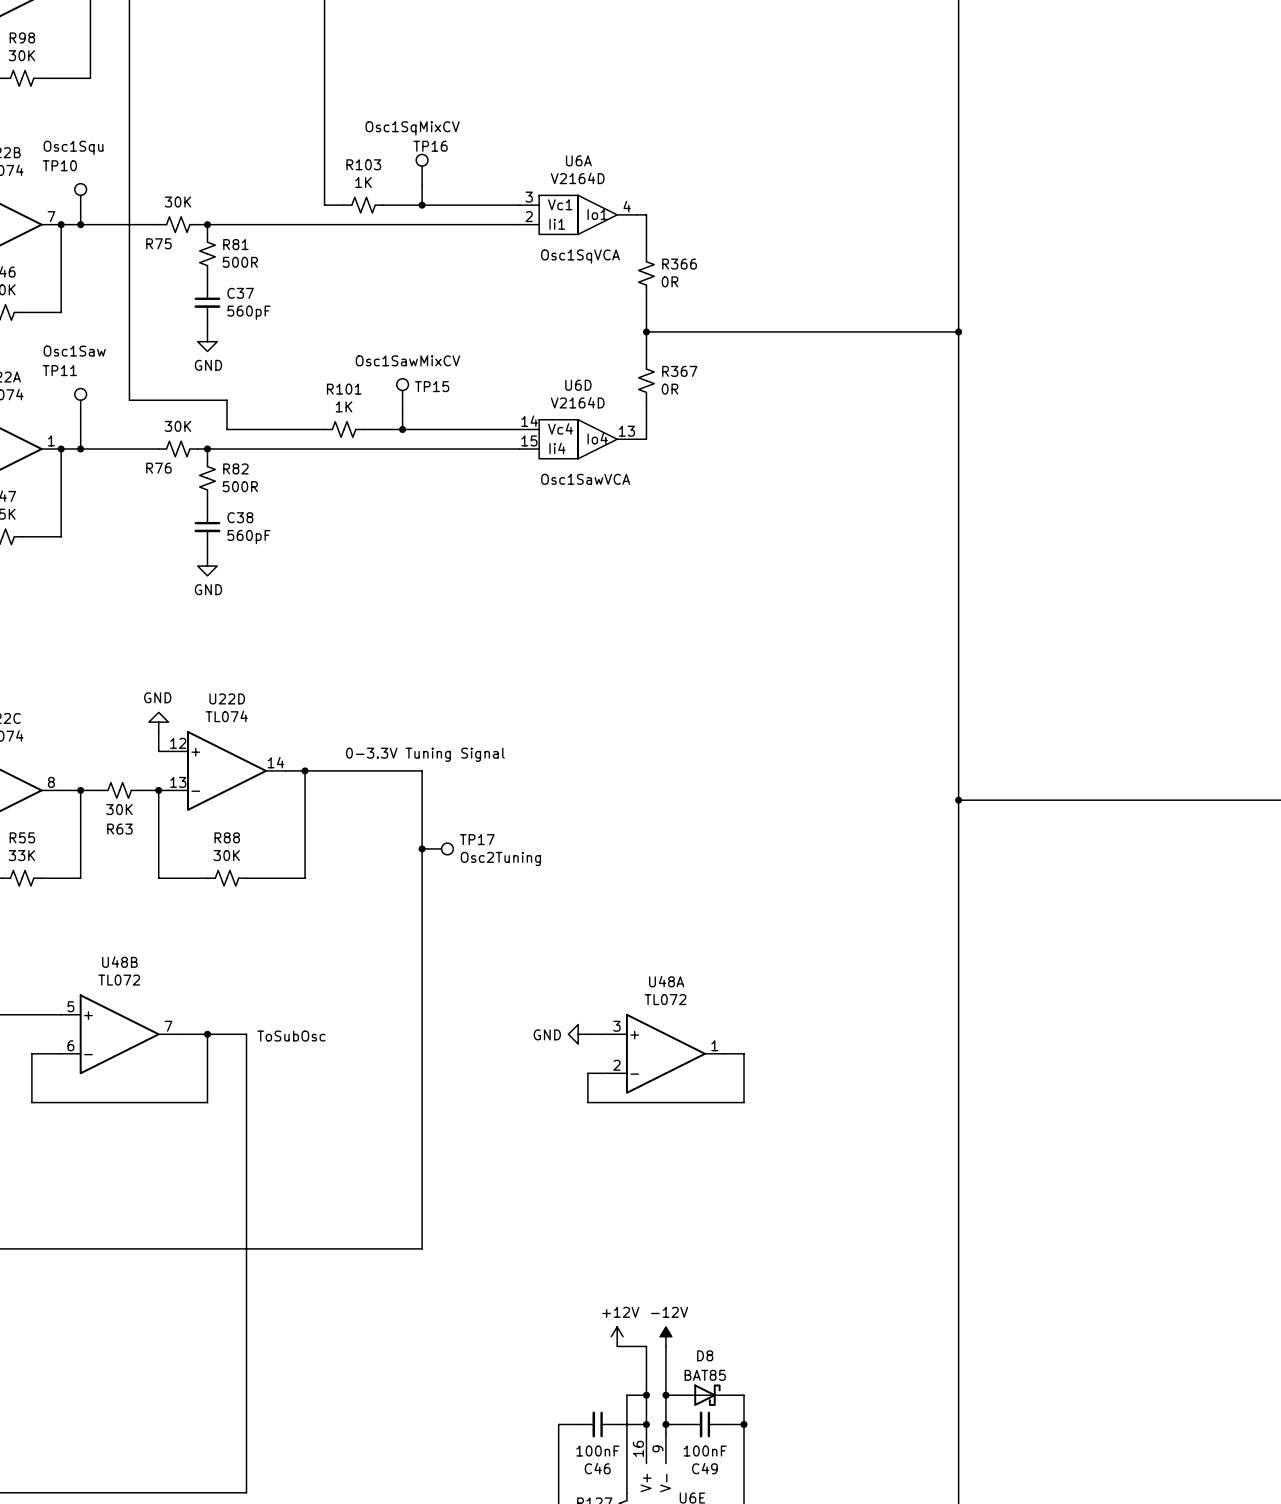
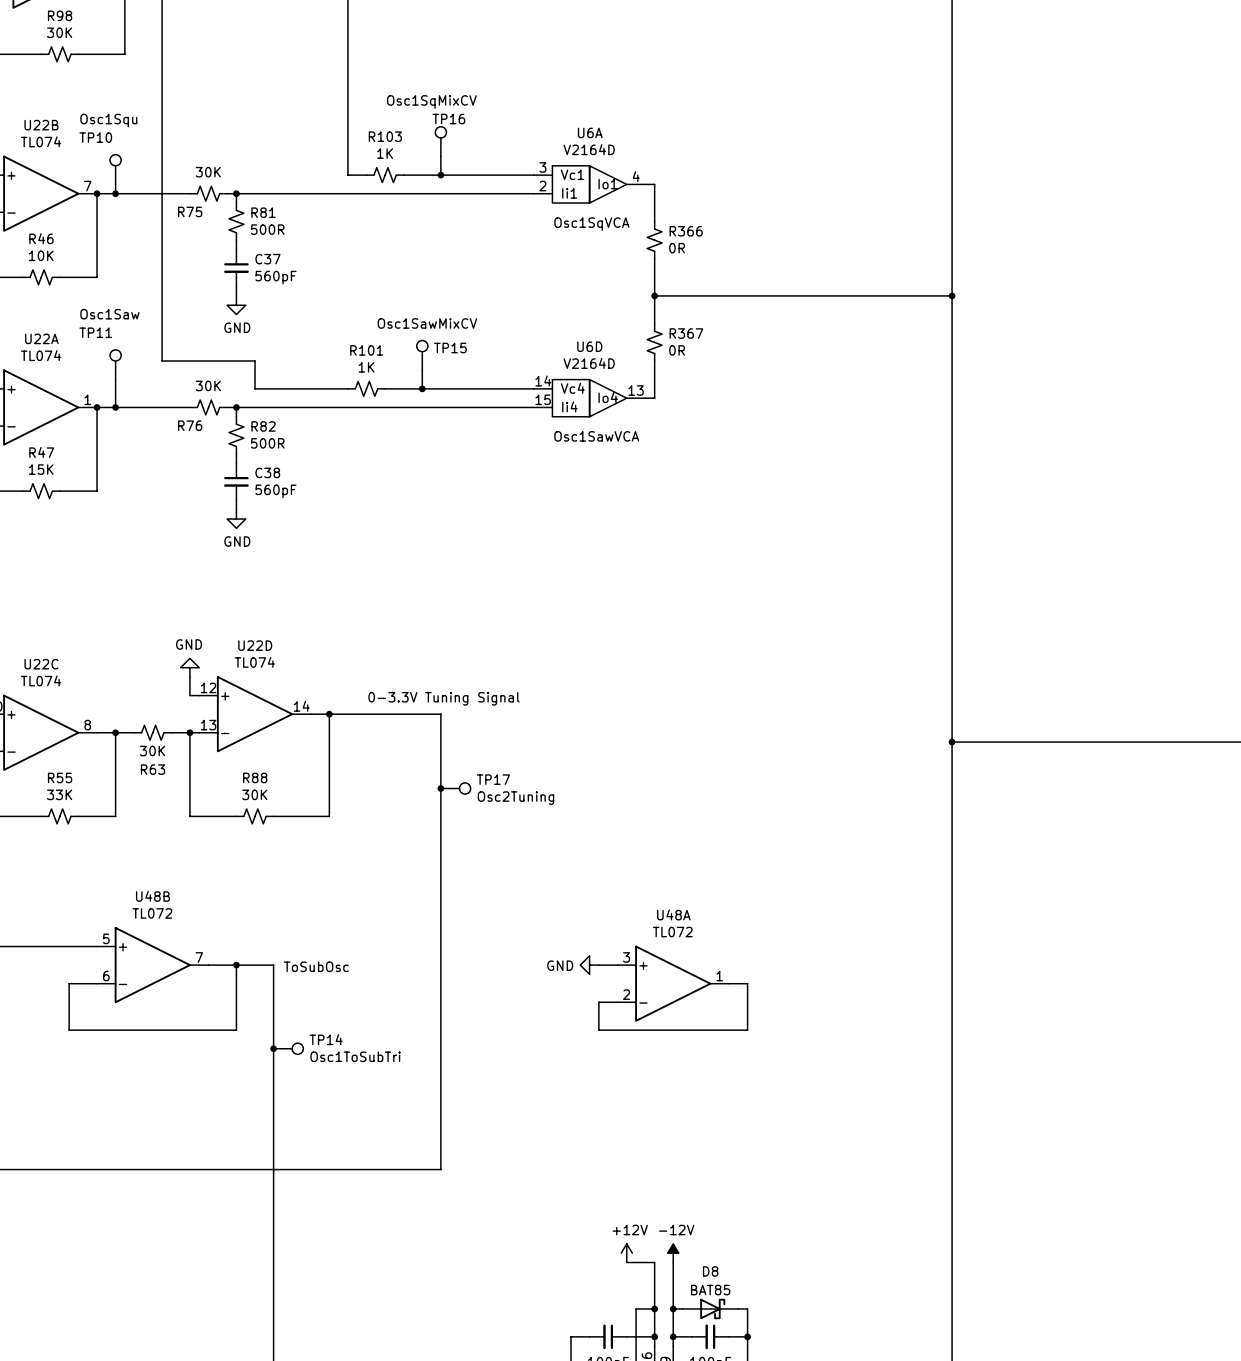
junction: none -> (273, 1048)
TP14: none -> Osc1ToSubTri (288, 1048)

